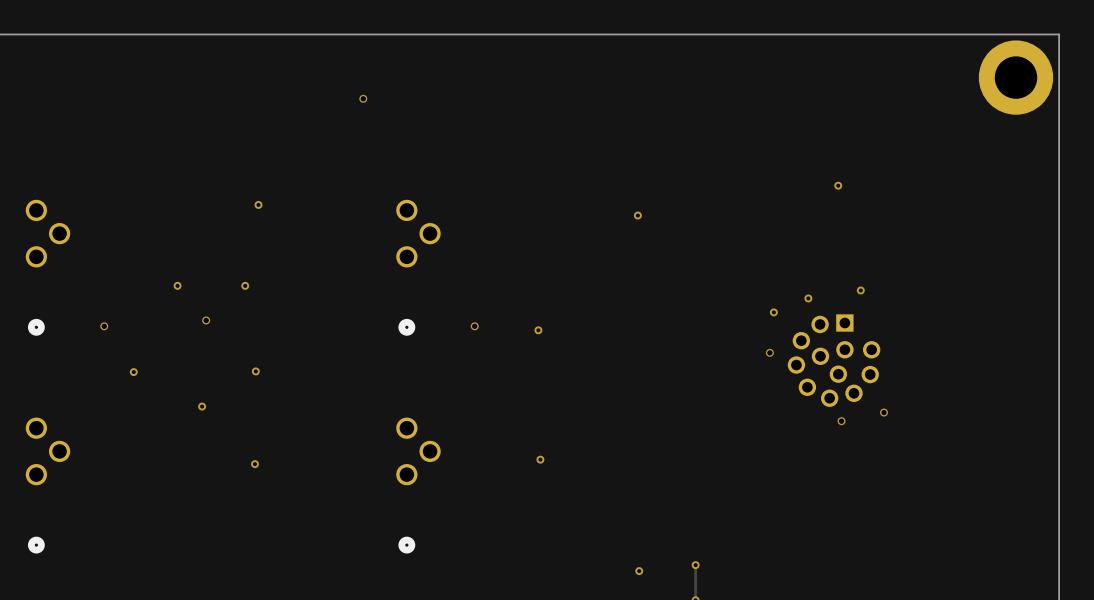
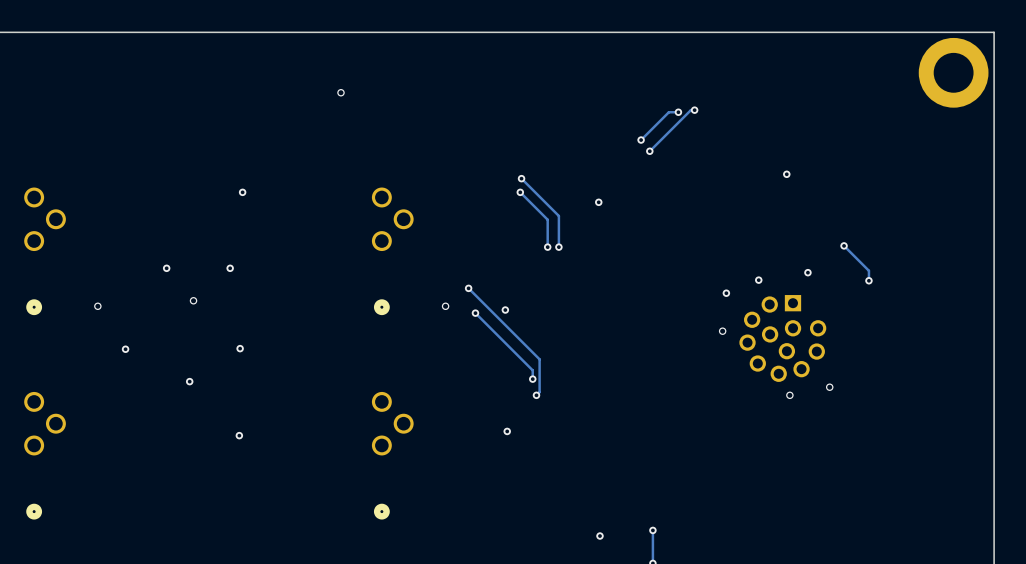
track: none -> (694, 110) (690, 110) (649, 151)
via: none -> (694, 110)
track: none -> (678, 112) (668, 112) (641, 140)
via: none -> (678, 112)
via: none -> (641, 140)
via: none -> (649, 151)
track: none -> (521, 178) (558, 216) (558, 247)
via: none -> (521, 178)
track: none -> (520, 192) (547, 219) (547, 247)
via: none -> (520, 192)
track: none -> (844, 245) (868, 270) (868, 280)
via: none -> (844, 245)
via: none -> (547, 247)
via: none -> (558, 247)
via: none -> (868, 280)
track: none -> (468, 288) (539, 359) (539, 392) (536, 395)
via: none -> (468, 288)
track: none -> (475, 313) (532, 370) (532, 379)
via: none -> (475, 313)
via: none -> (532, 379)
via: none -> (536, 395)

